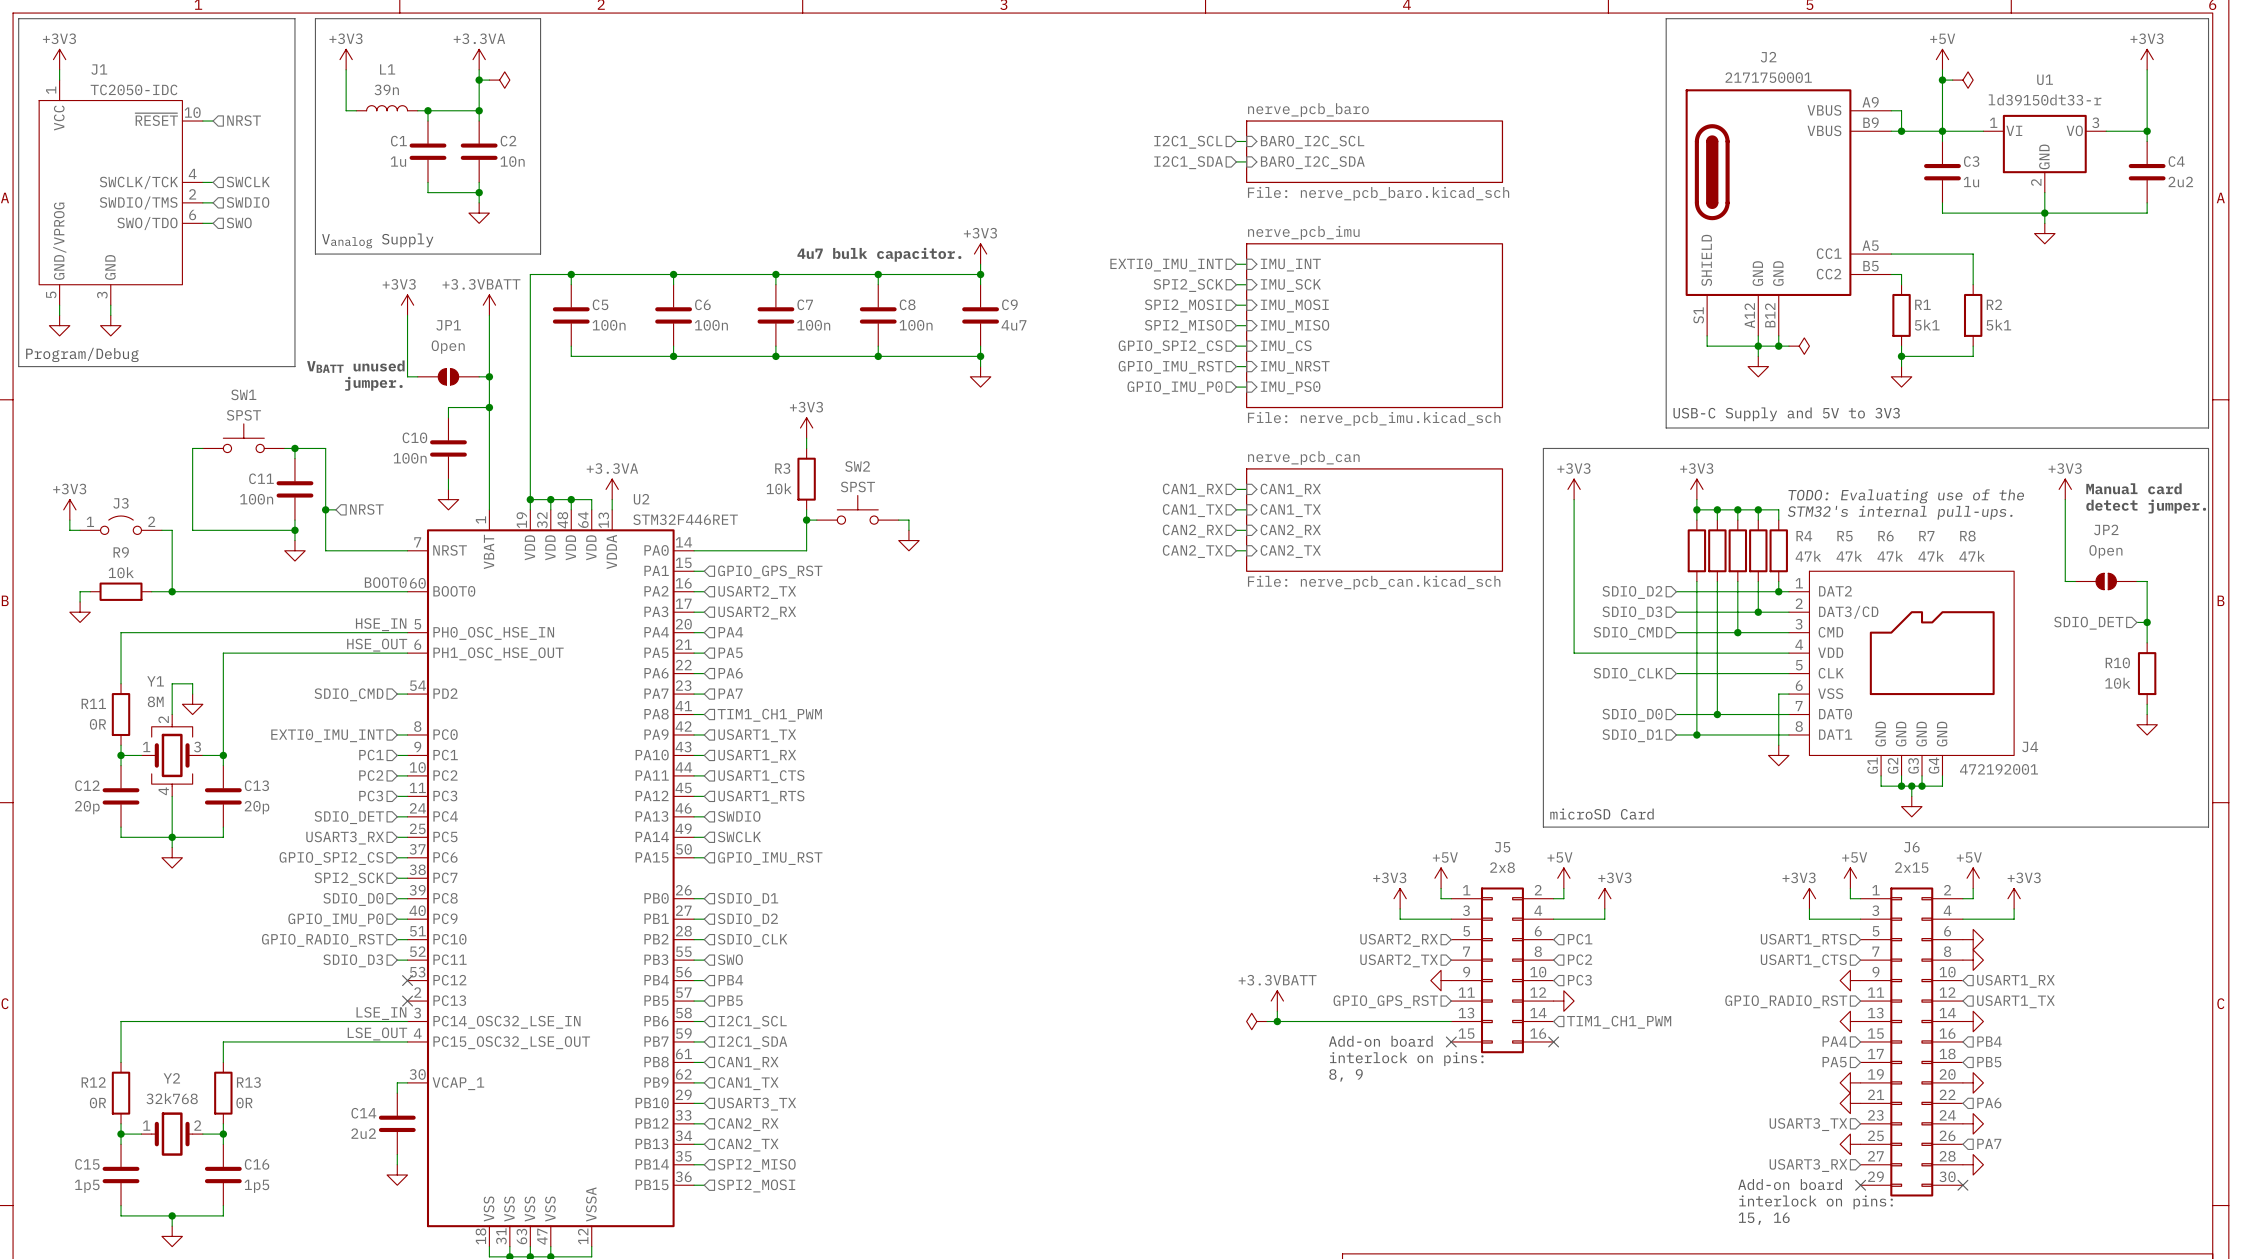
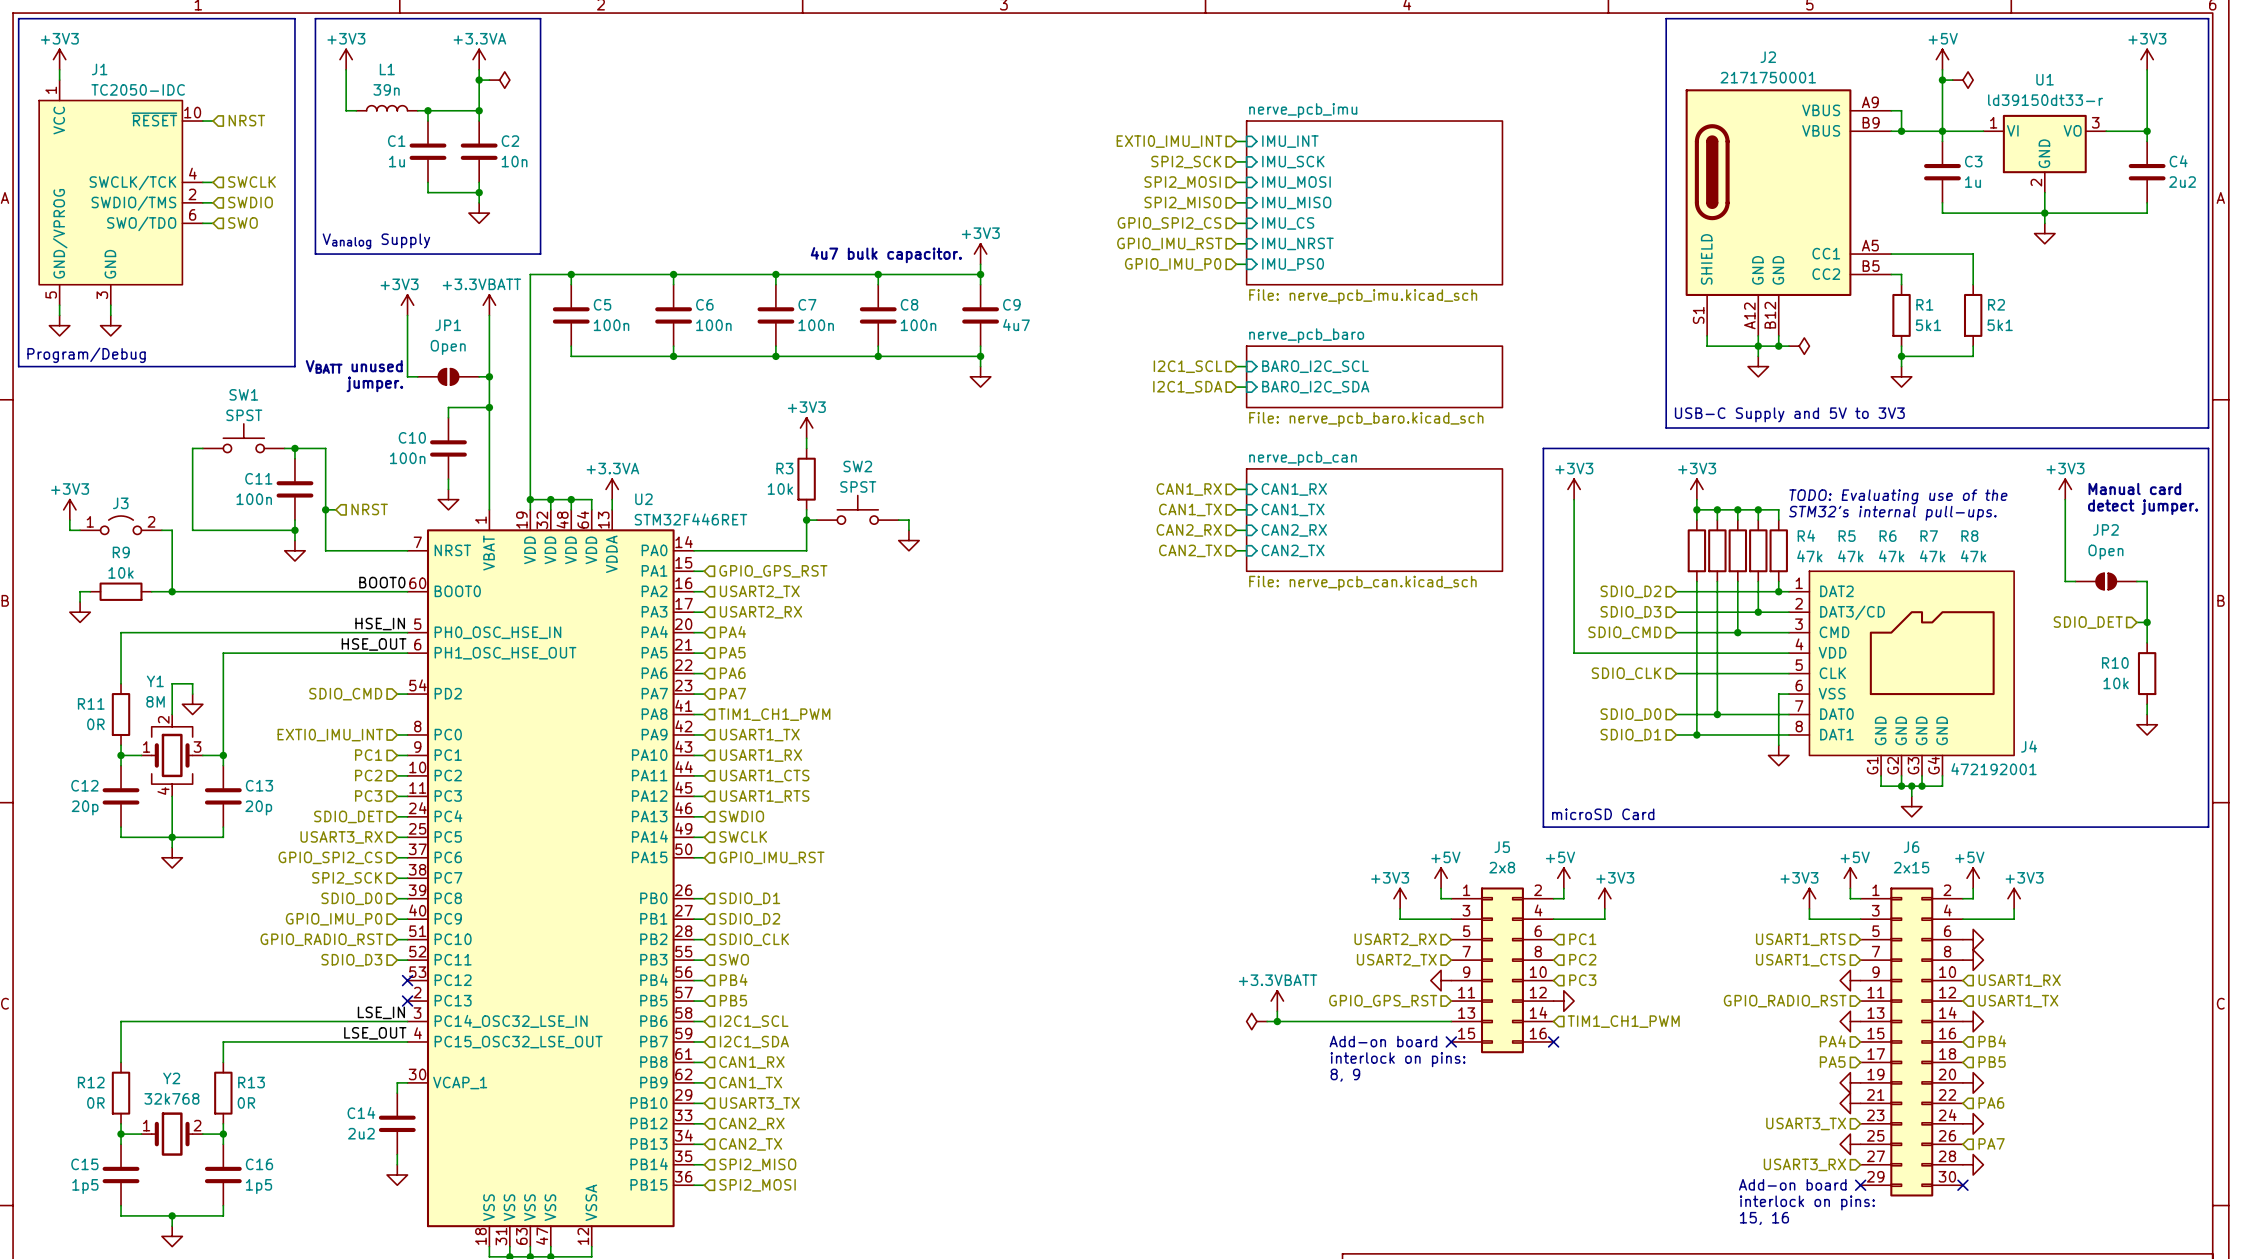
hierarchical label: I2C1_SCL (1188, 142) -> EXTI0_IMU_INT (1169, 141)
sheet pin: BARO_I2C_SCL (1312, 142) -> IMU_INT (1290, 141)
sheet nerve_pcb_baro: File: nerve_pcb_baro.kicad_sch (1374, 151) -> none
hierarchical label: I2C1_SDA (1188, 162) -> SPI2_SCK (1186, 162)
sheet pin: BARO_I2C_SDA (1312, 162) -> IMU_SCK (1293, 162)
hierarchical label: none -> GPIO_IMU_RST (1169, 243)
sheet pin: none -> IMU_NRST (1297, 243)
hierarchical label: EXTI0_IMU_INT (1166, 265) -> GPIO_IMU_P0 (1173, 264)
sheet pin: IMU_INT (1290, 265) -> IMU_PS0 (1293, 264)
wire: (1236, 284) (1246, 284) -> (1236, 182) (1246, 182)
hierarchical label: SPI2_SCK (1188, 285) -> none
sheet pin: IMU_SCK (1290, 285) -> none
hierarchical label position: SPI2_MOSI (1183, 305) -> SPI2_MOSI (1182, 182)
wire: (1236, 305) (1246, 305) -> (1236, 202) (1246, 202)
sheet pin position: IMU_MOSI (1294, 305) -> IMU_MOSI (1296, 182)
wire: (1236, 325) (1246, 325) -> (1236, 223) (1246, 223)
sheet nerve_pcb_imu position: (1374, 325) -> (1374, 202)
hierarchical label position: SPI2_MISO (1183, 326) -> SPI2_MISO (1182, 202)
sheet pin position: IMU_MISO (1295, 326) -> IMU_MISO (1296, 202)
hierarchical label position: GPIO_SPI2_CS (1170, 346) -> GPIO_SPI2_CS (1169, 223)
wire: (1236, 346) (1246, 346) -> (1236, 243) (1246, 243)
sheet pin position: IMU_CS (1286, 346) -> IMU_CS (1288, 223)
hierarchical label: GPIO_IMU_RST (1170, 367) -> I2C1_SCL (1188, 366)
sheet pin: IMU_NRST (1295, 367) -> BARO_I2C_SCL (1315, 366)
sheet nerve_pcb_baro: none -> File: nerve_pcb_baro.kicad_sch (1374, 376)
hierarchical label: GPIO_IMU_P0 (1175, 387) -> I2C1_SDA (1187, 387)
sheet pin: IMU_PS0 (1290, 387) -> BARO_I2C_SDA (1315, 387)

